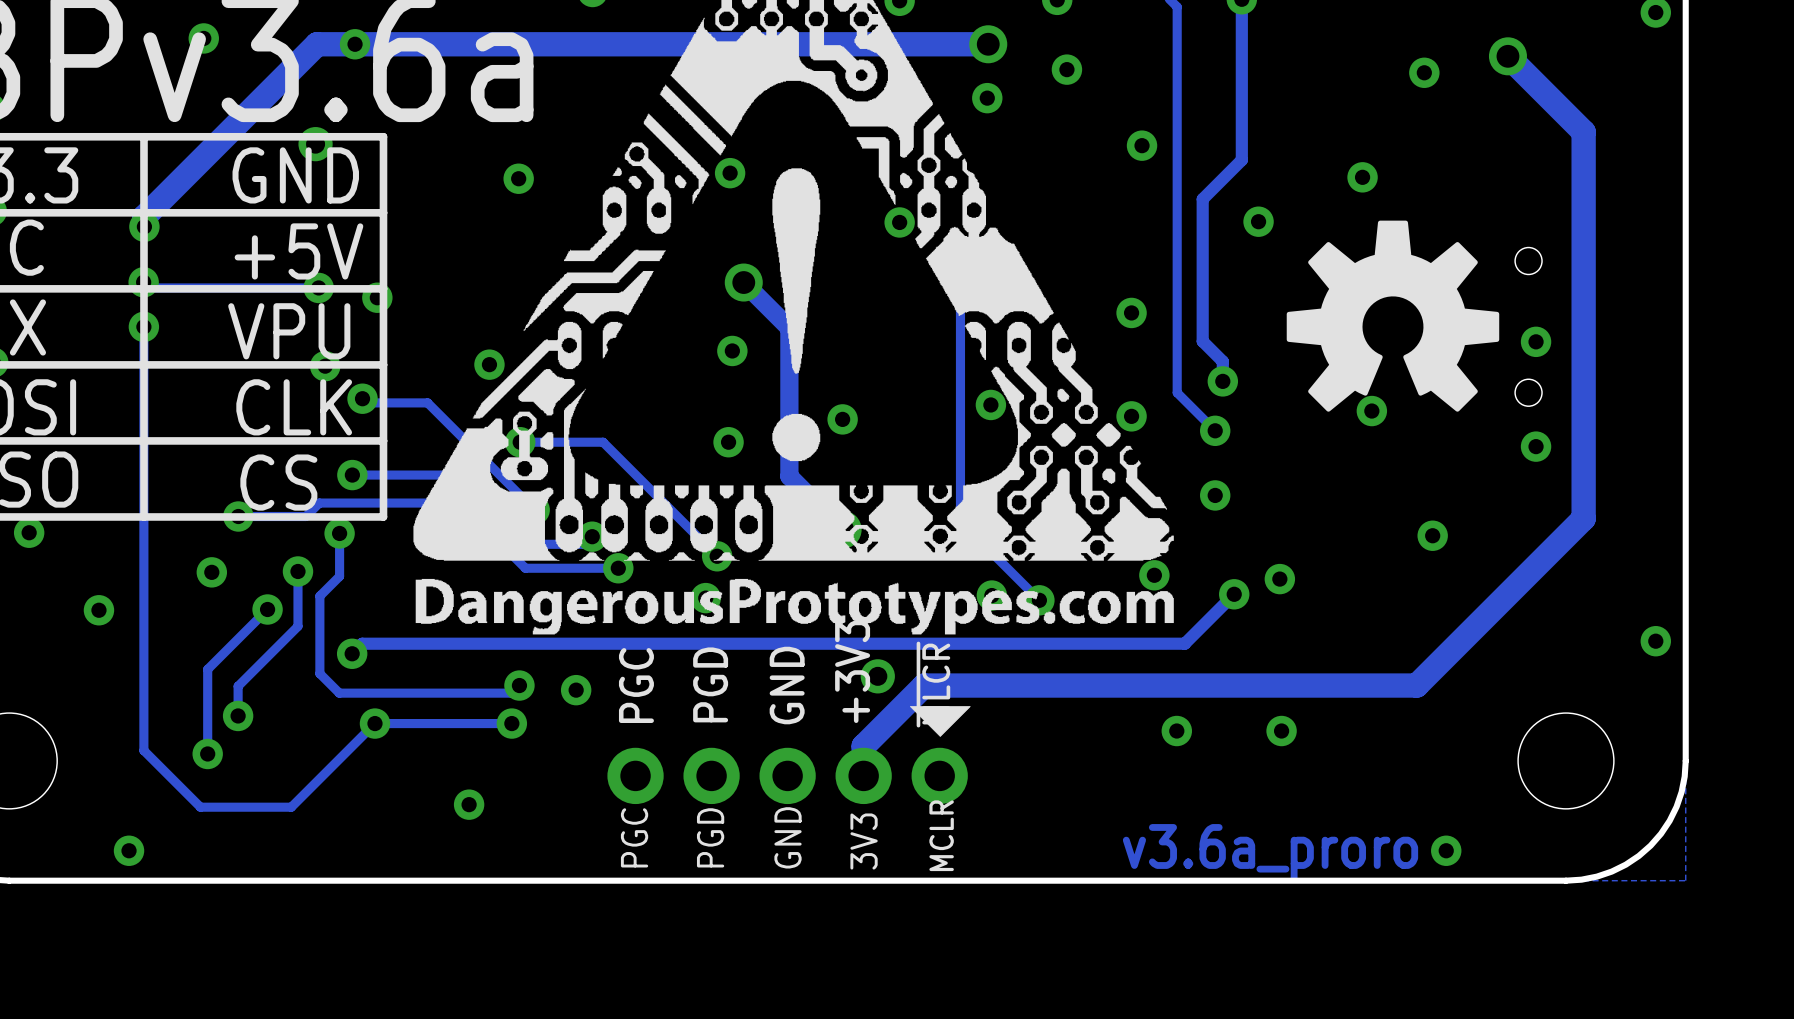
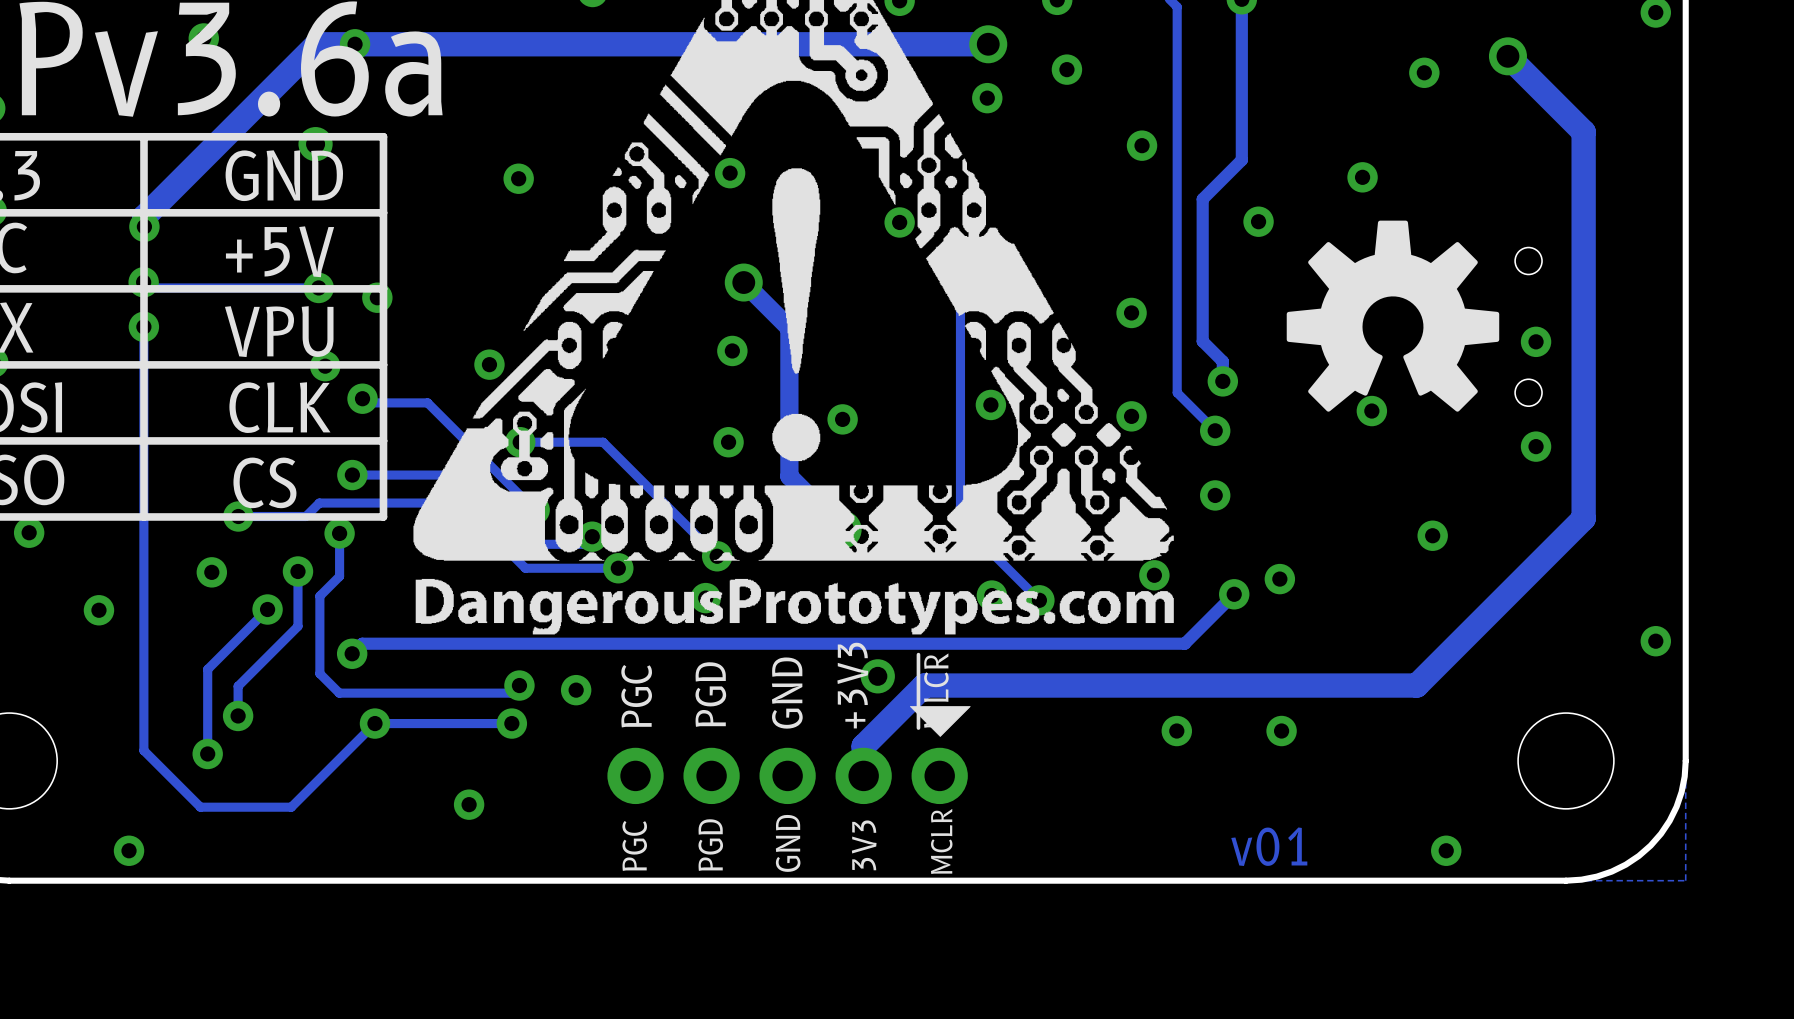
text: v3.6a_proro (1270, 852) -> v01 (1269, 846)

